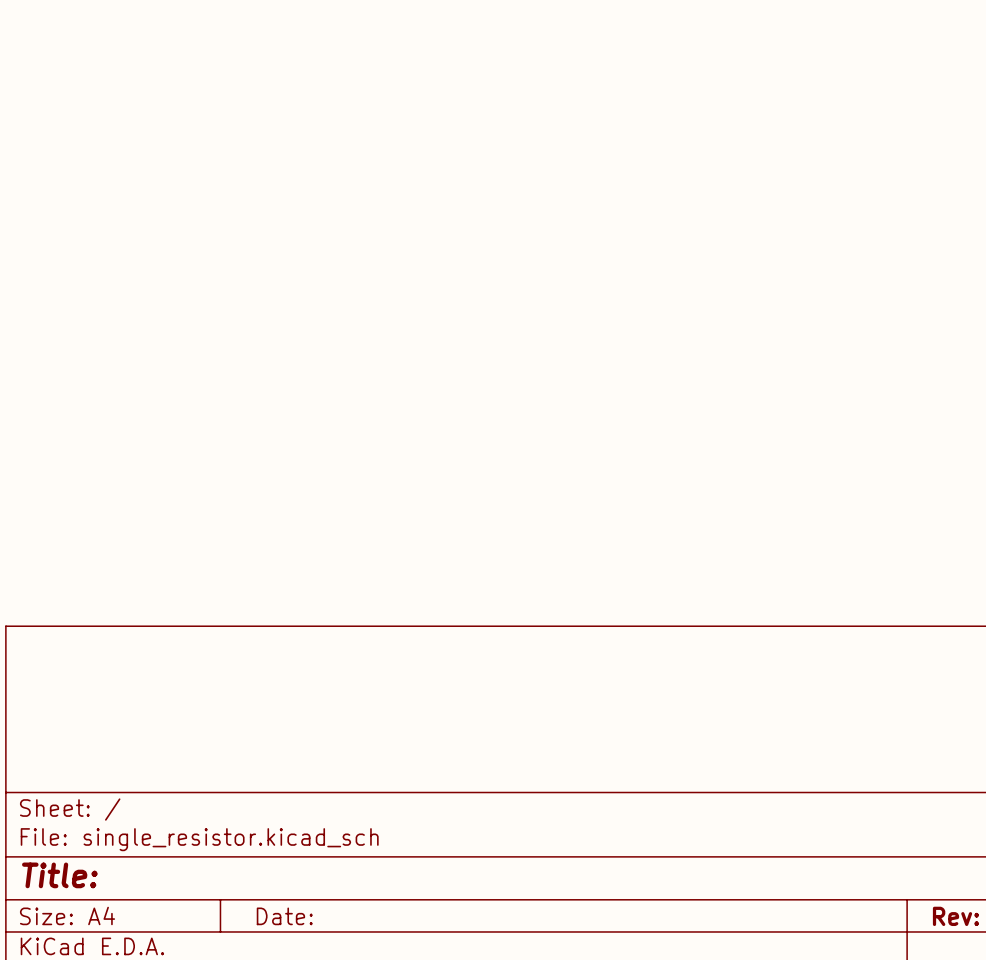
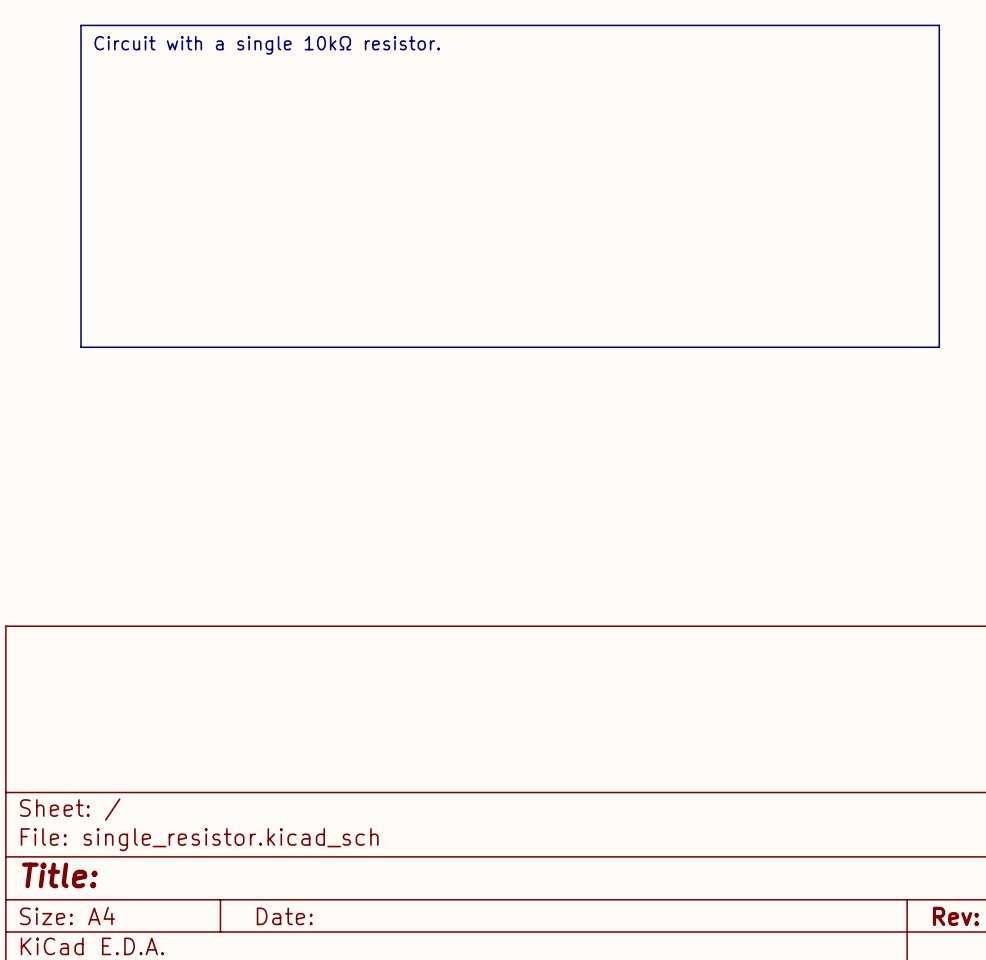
line: none -> (80, 25) (939, 25) (939, 347) (80, 347) (80, 25)
text: none -> Circuit with a single 10kΩ resistor. (267, 45)

